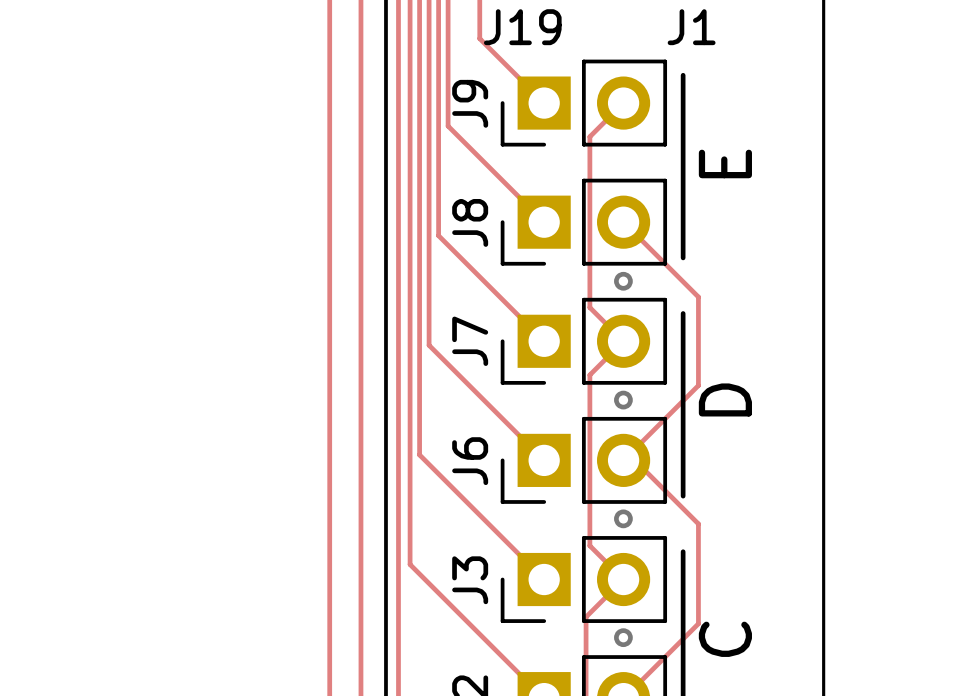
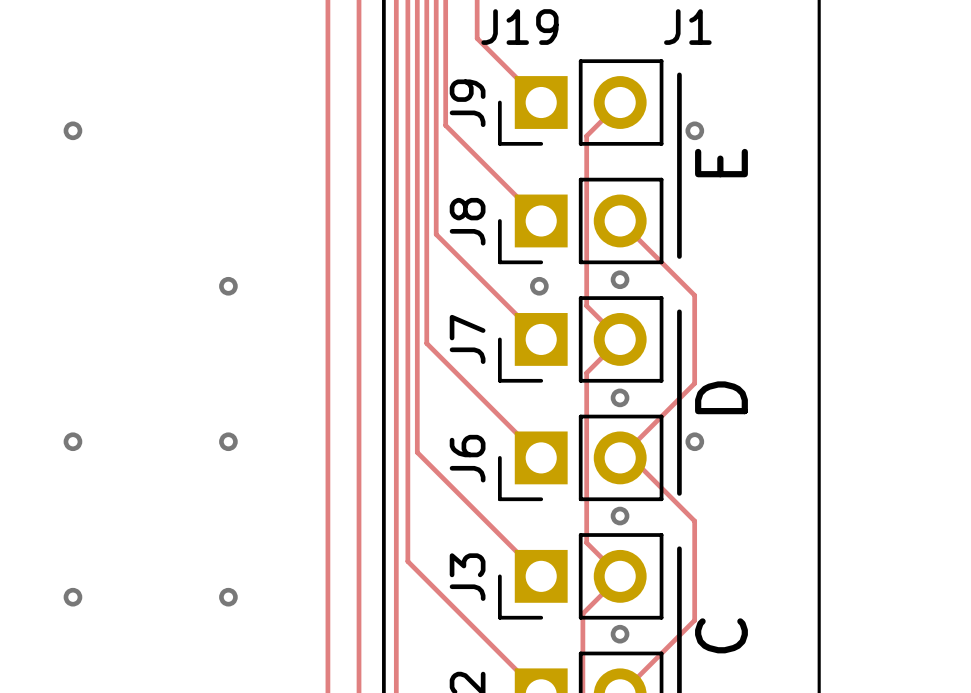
via: none -> (72, 130)
via: none -> (694, 130)
via: none -> (228, 286)
via: none -> (539, 286)
via: none -> (72, 441)
via: none -> (228, 441)
via: none -> (694, 441)
via: none -> (72, 597)
via: none -> (228, 597)

